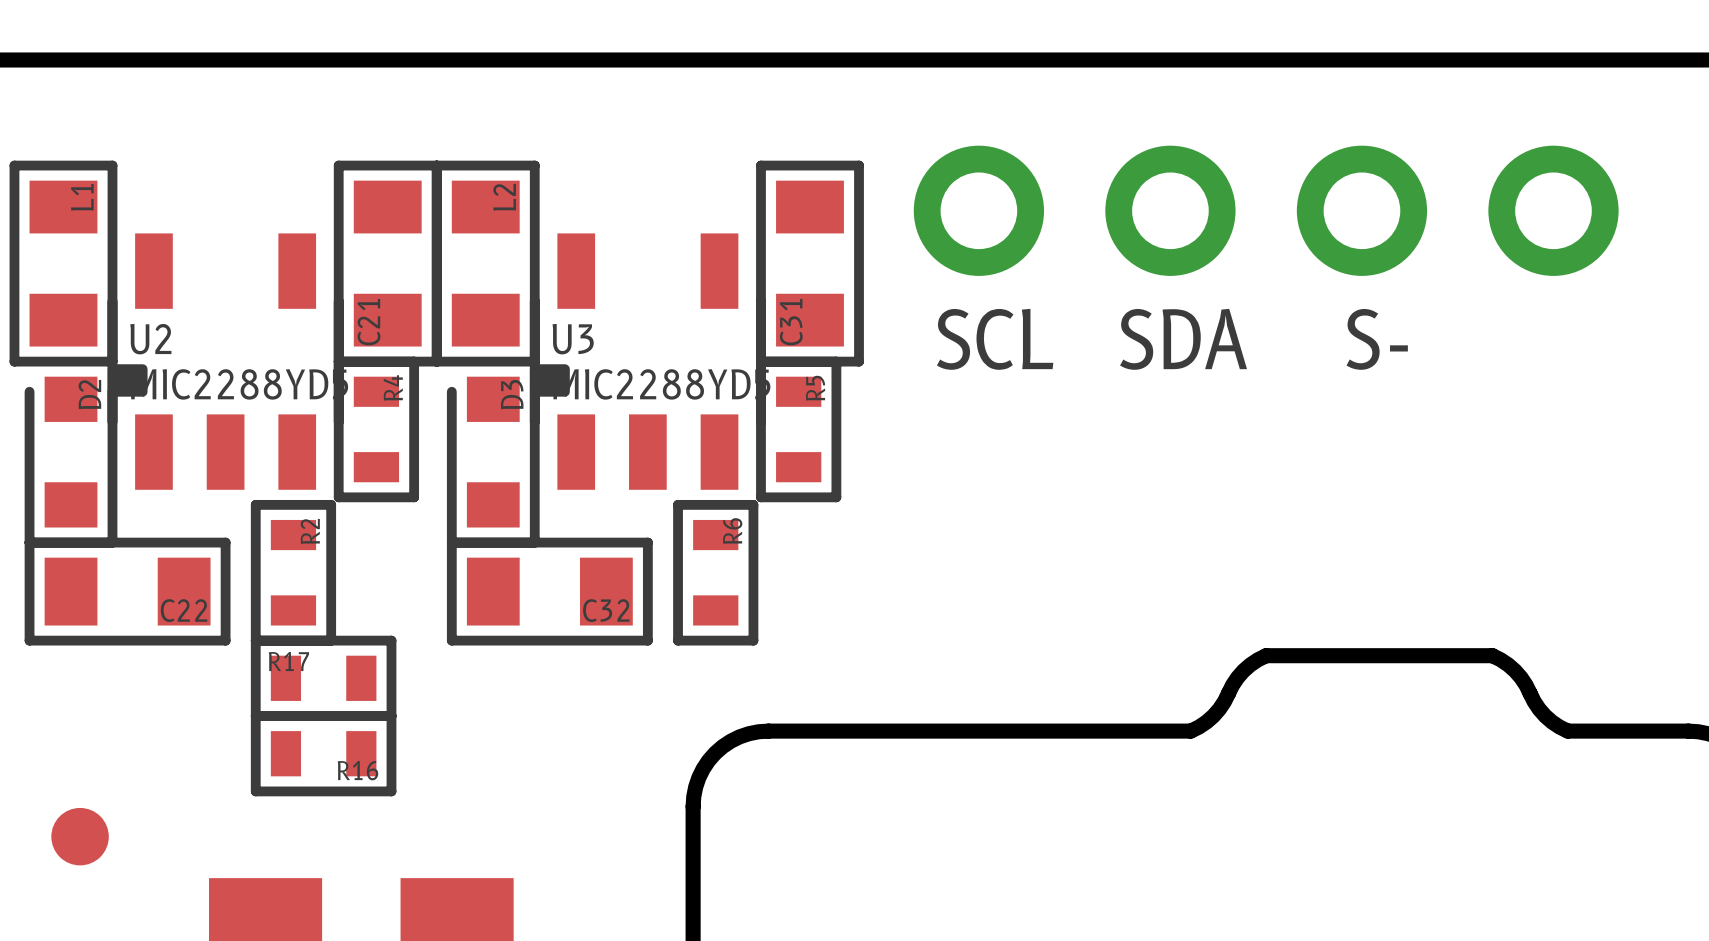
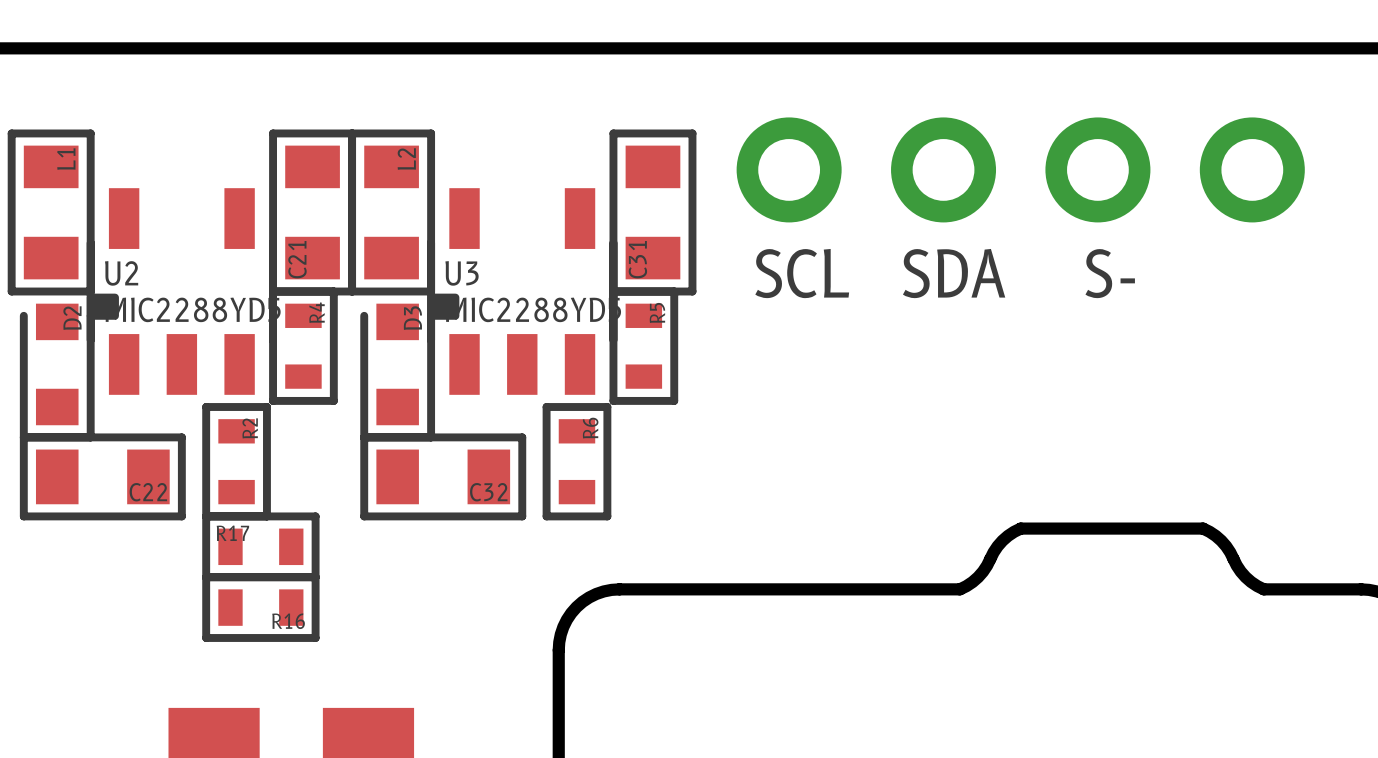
part: (80, 836) -> none

